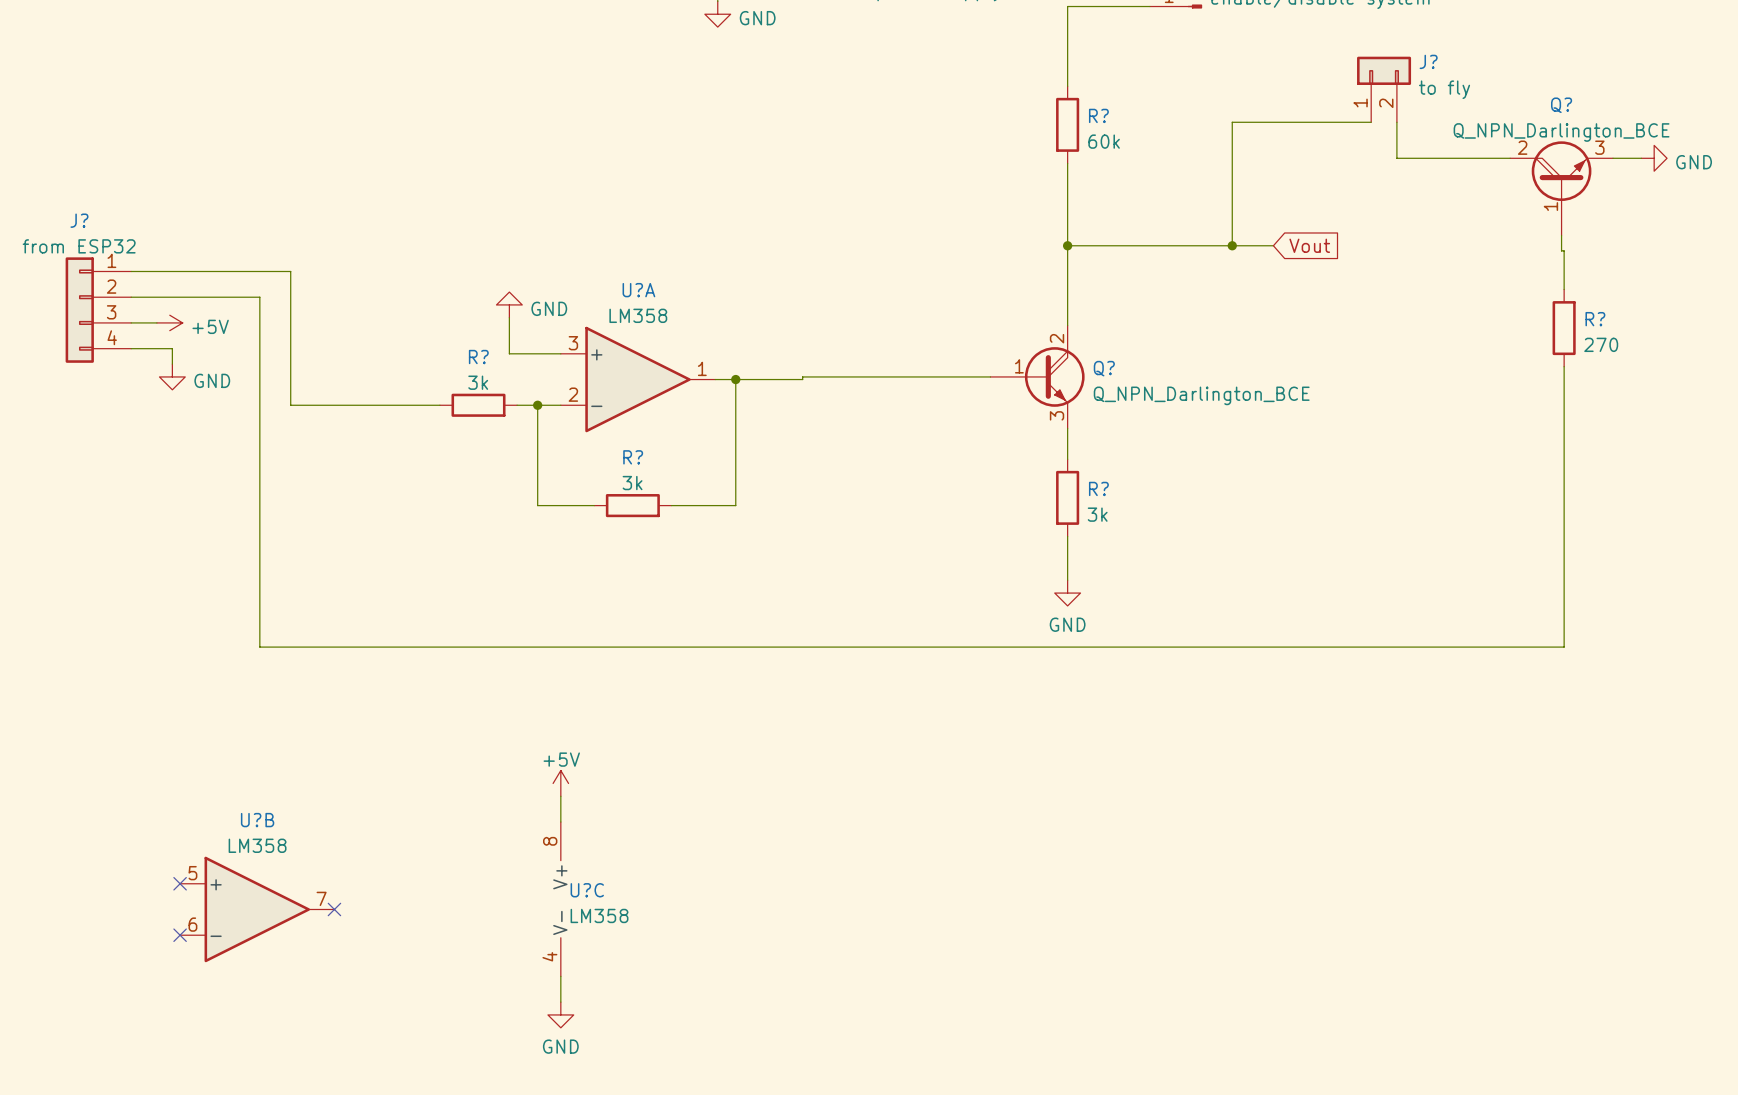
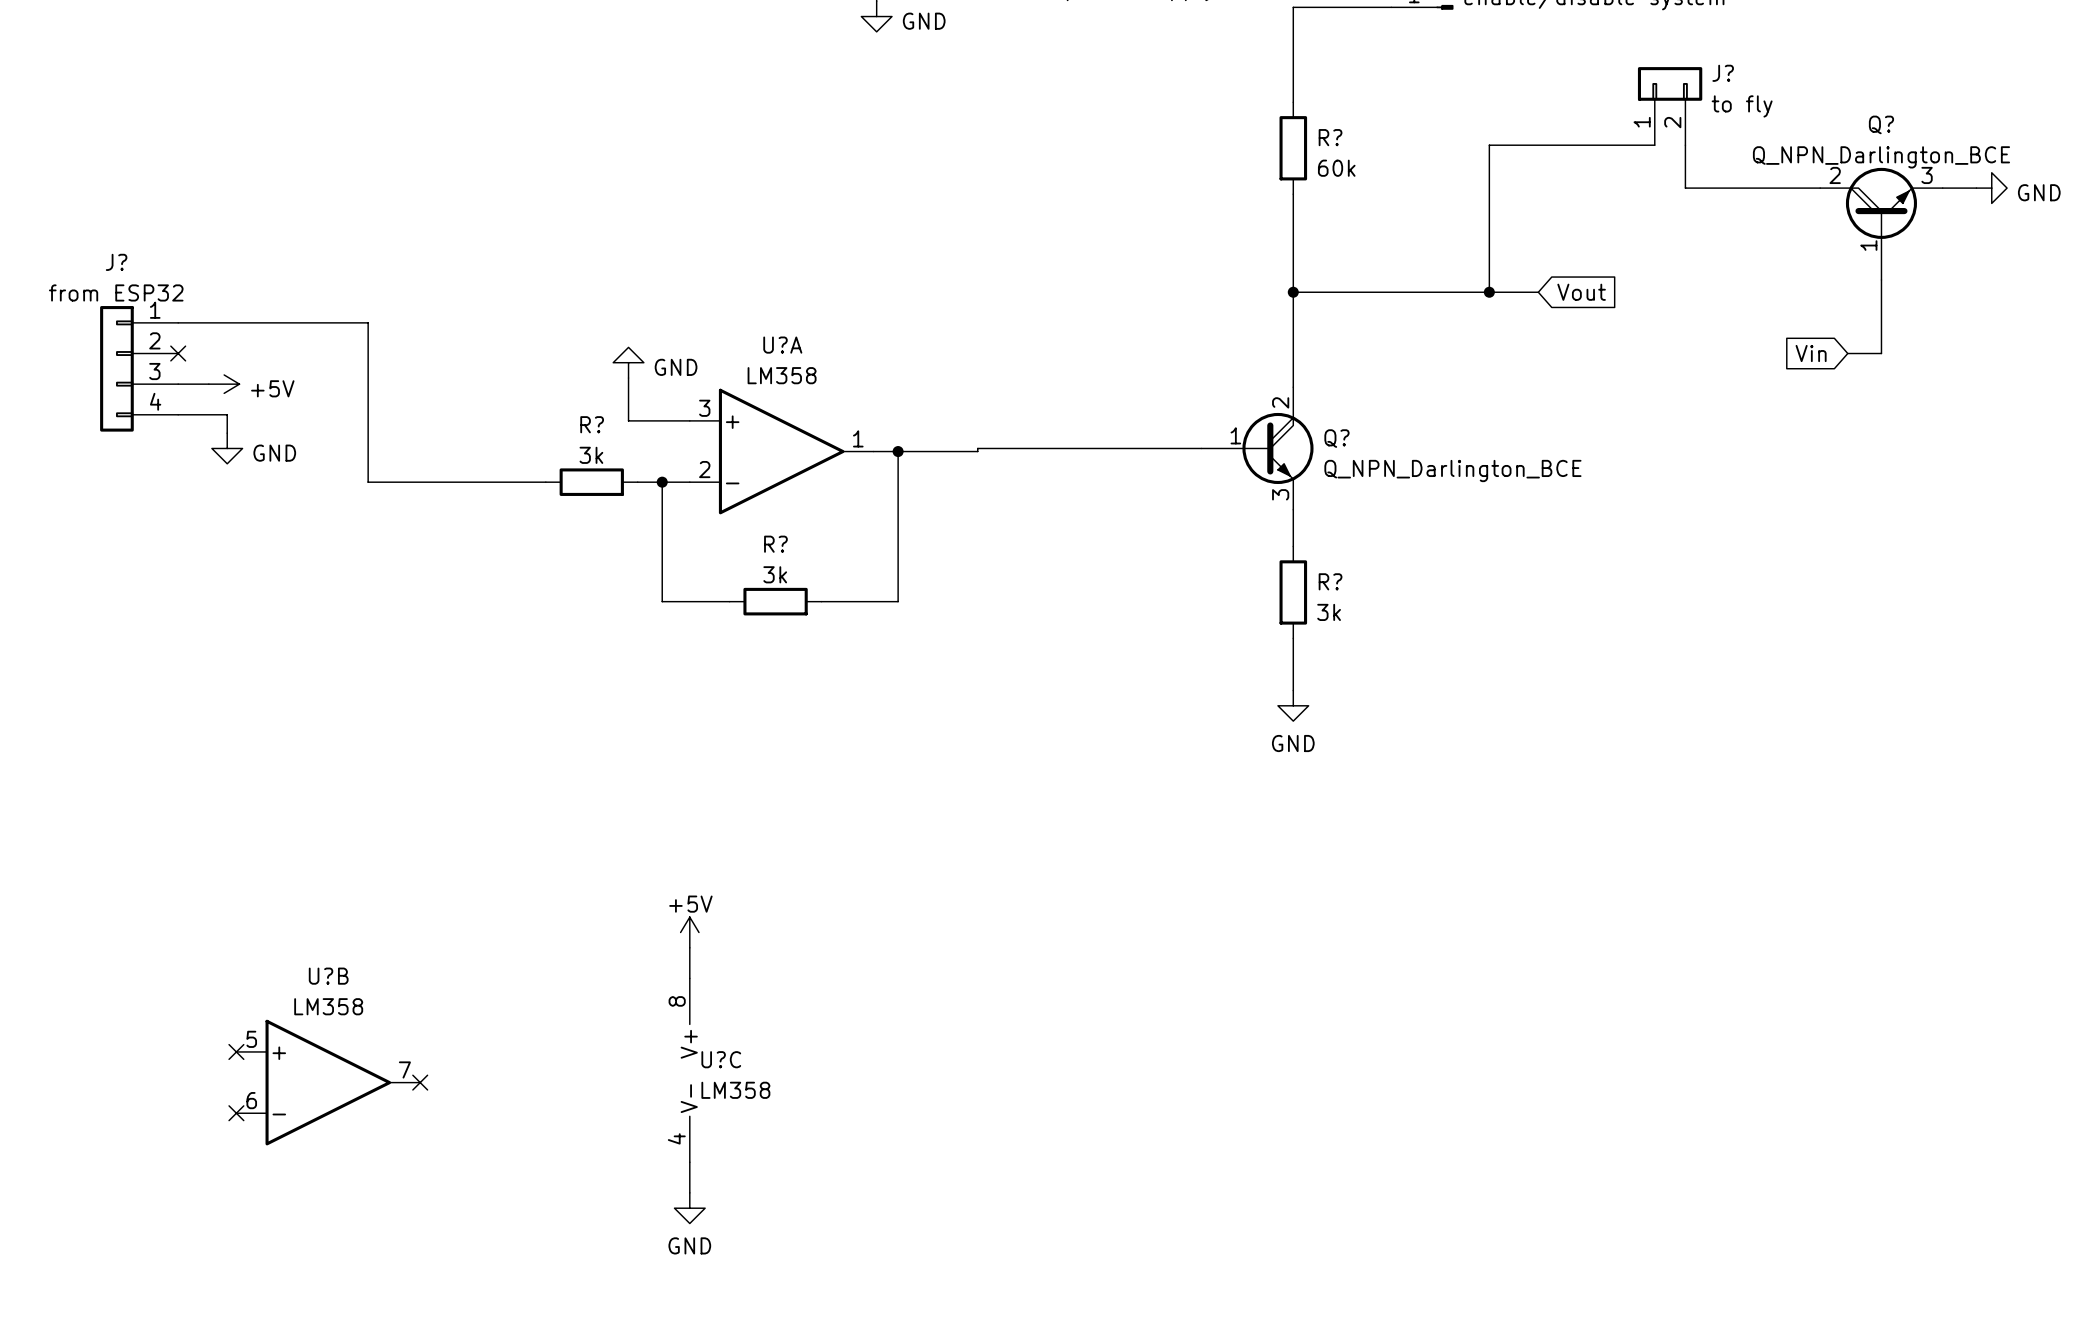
wire: (1561, 250) (1564, 250) (1564, 289) -> (1881, 298) (1881, 353) (1847, 353)
wire: (131, 297) (259, 297) (259, 647) (1564, 647) (1564, 366) -> none
no-connect mark: none -> (178, 353)
global label: none -> Vin (1811, 353)
R?: 270 (1564, 328) -> none

